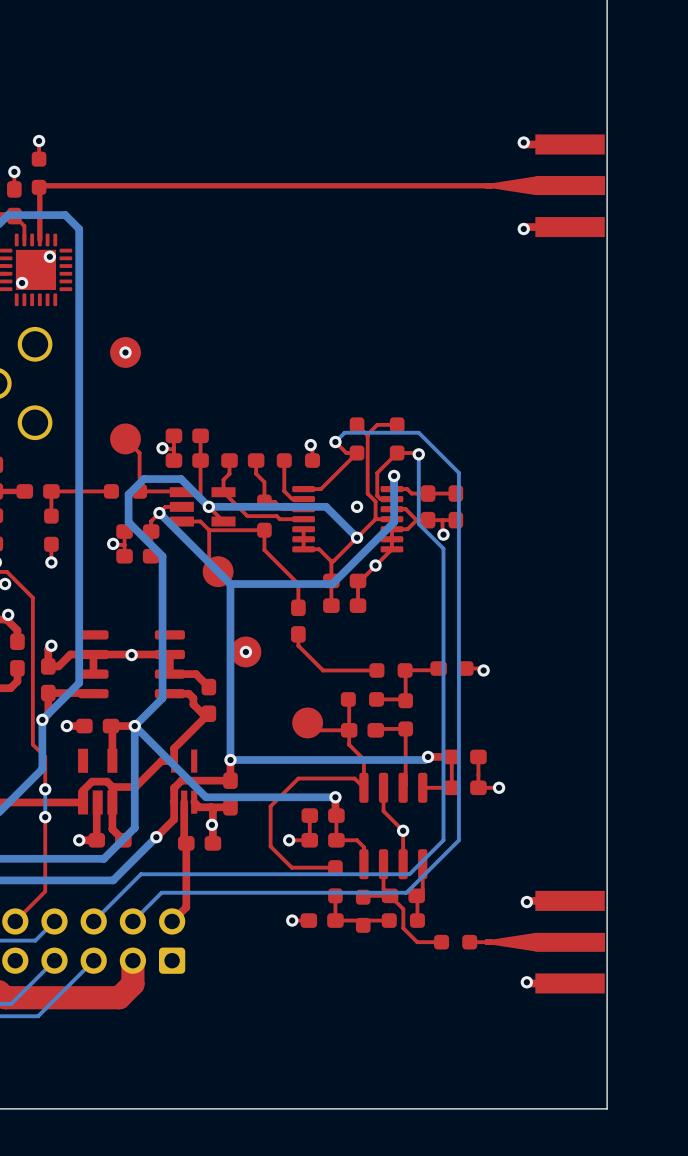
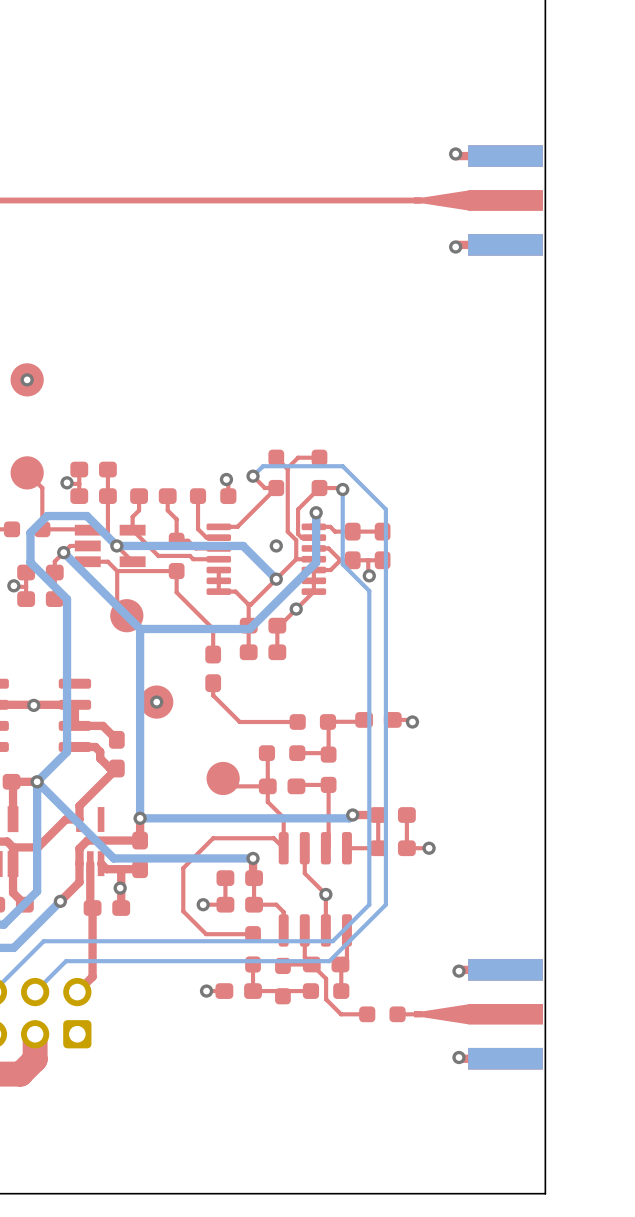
part footprint: [485, 134, 605, 238] -> [414, 145, 543, 256]
part footprint: [485, 890, 605, 994] -> [414, 959, 543, 1070]

